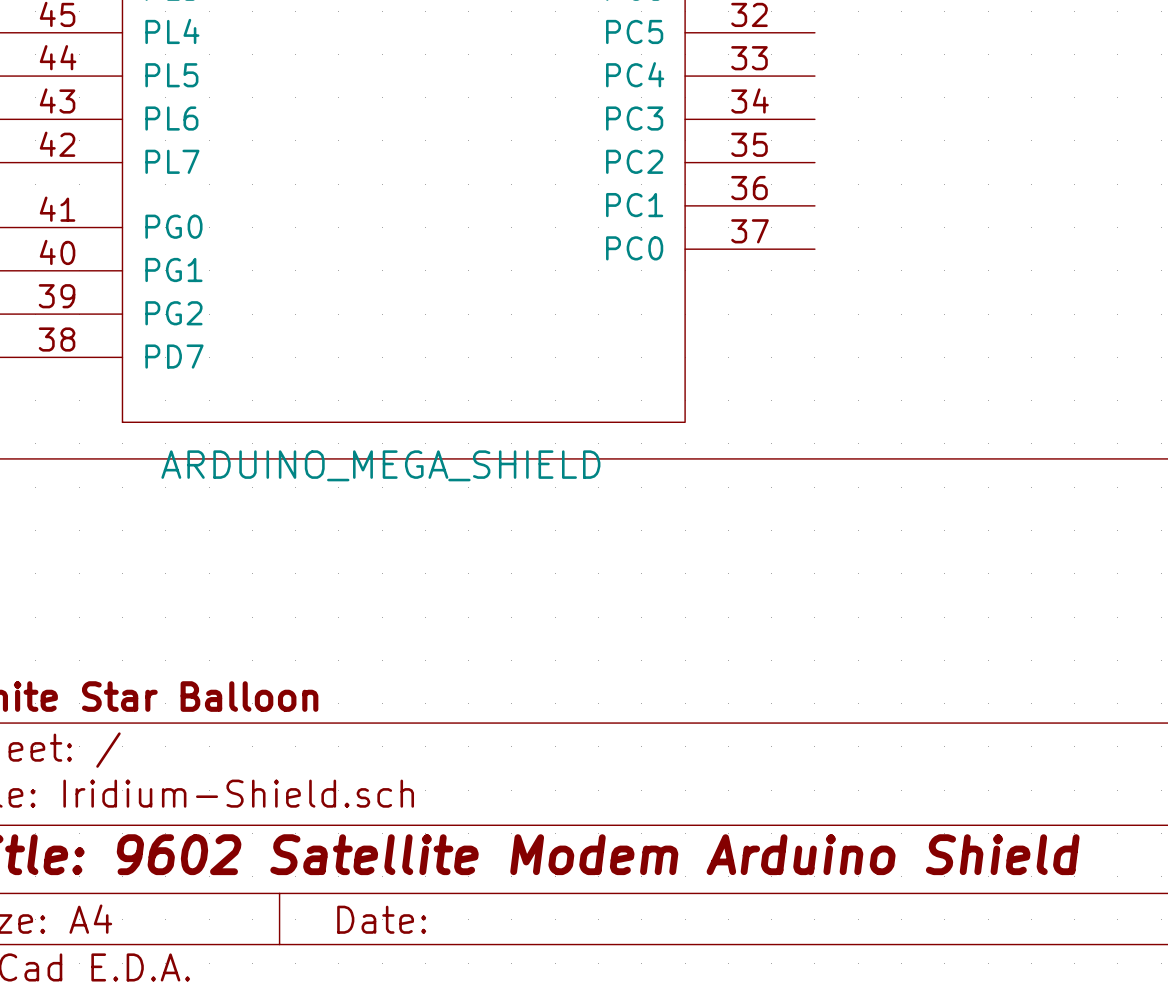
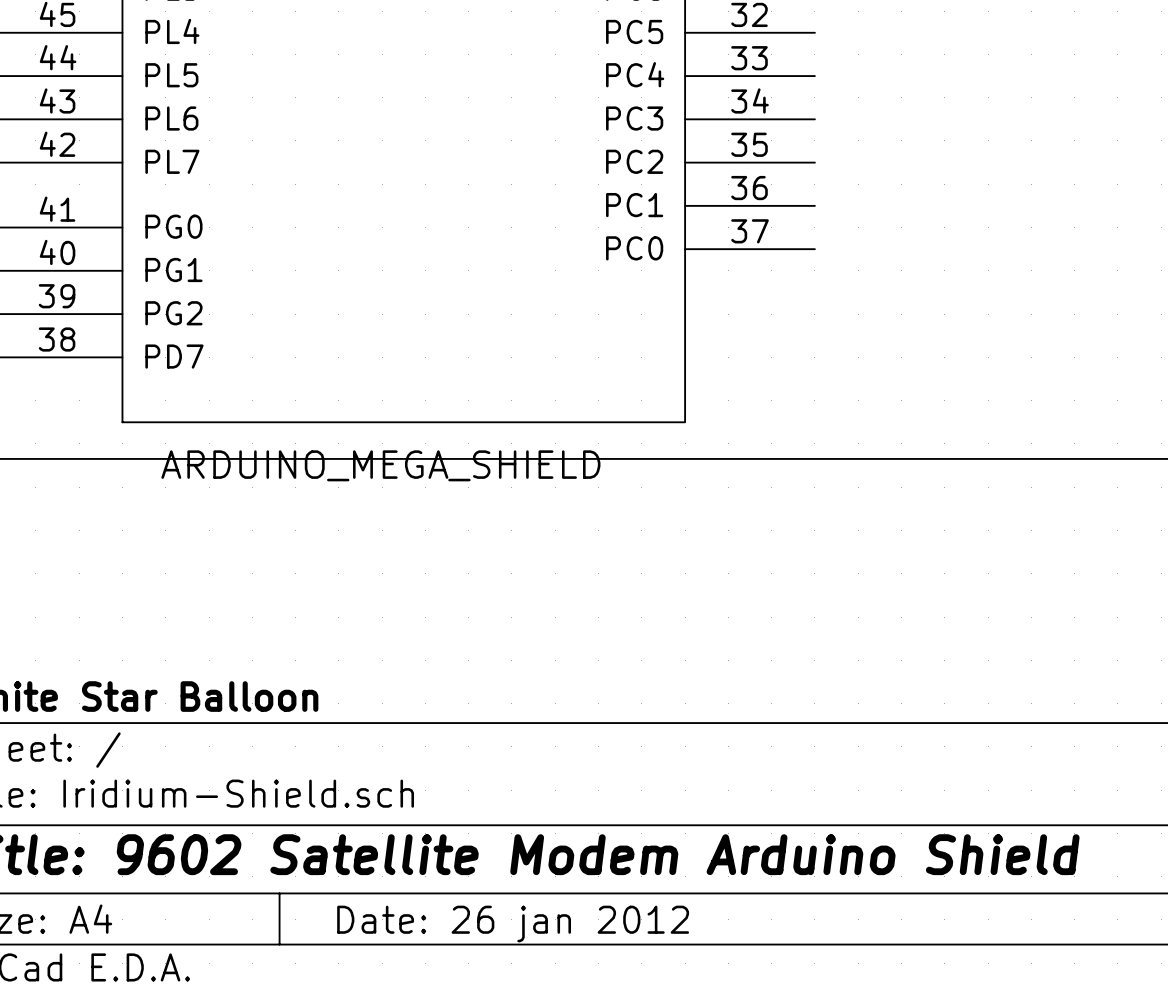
title block: Date: (381, 919) -> Date: 26 jan 2012 (513, 924)

